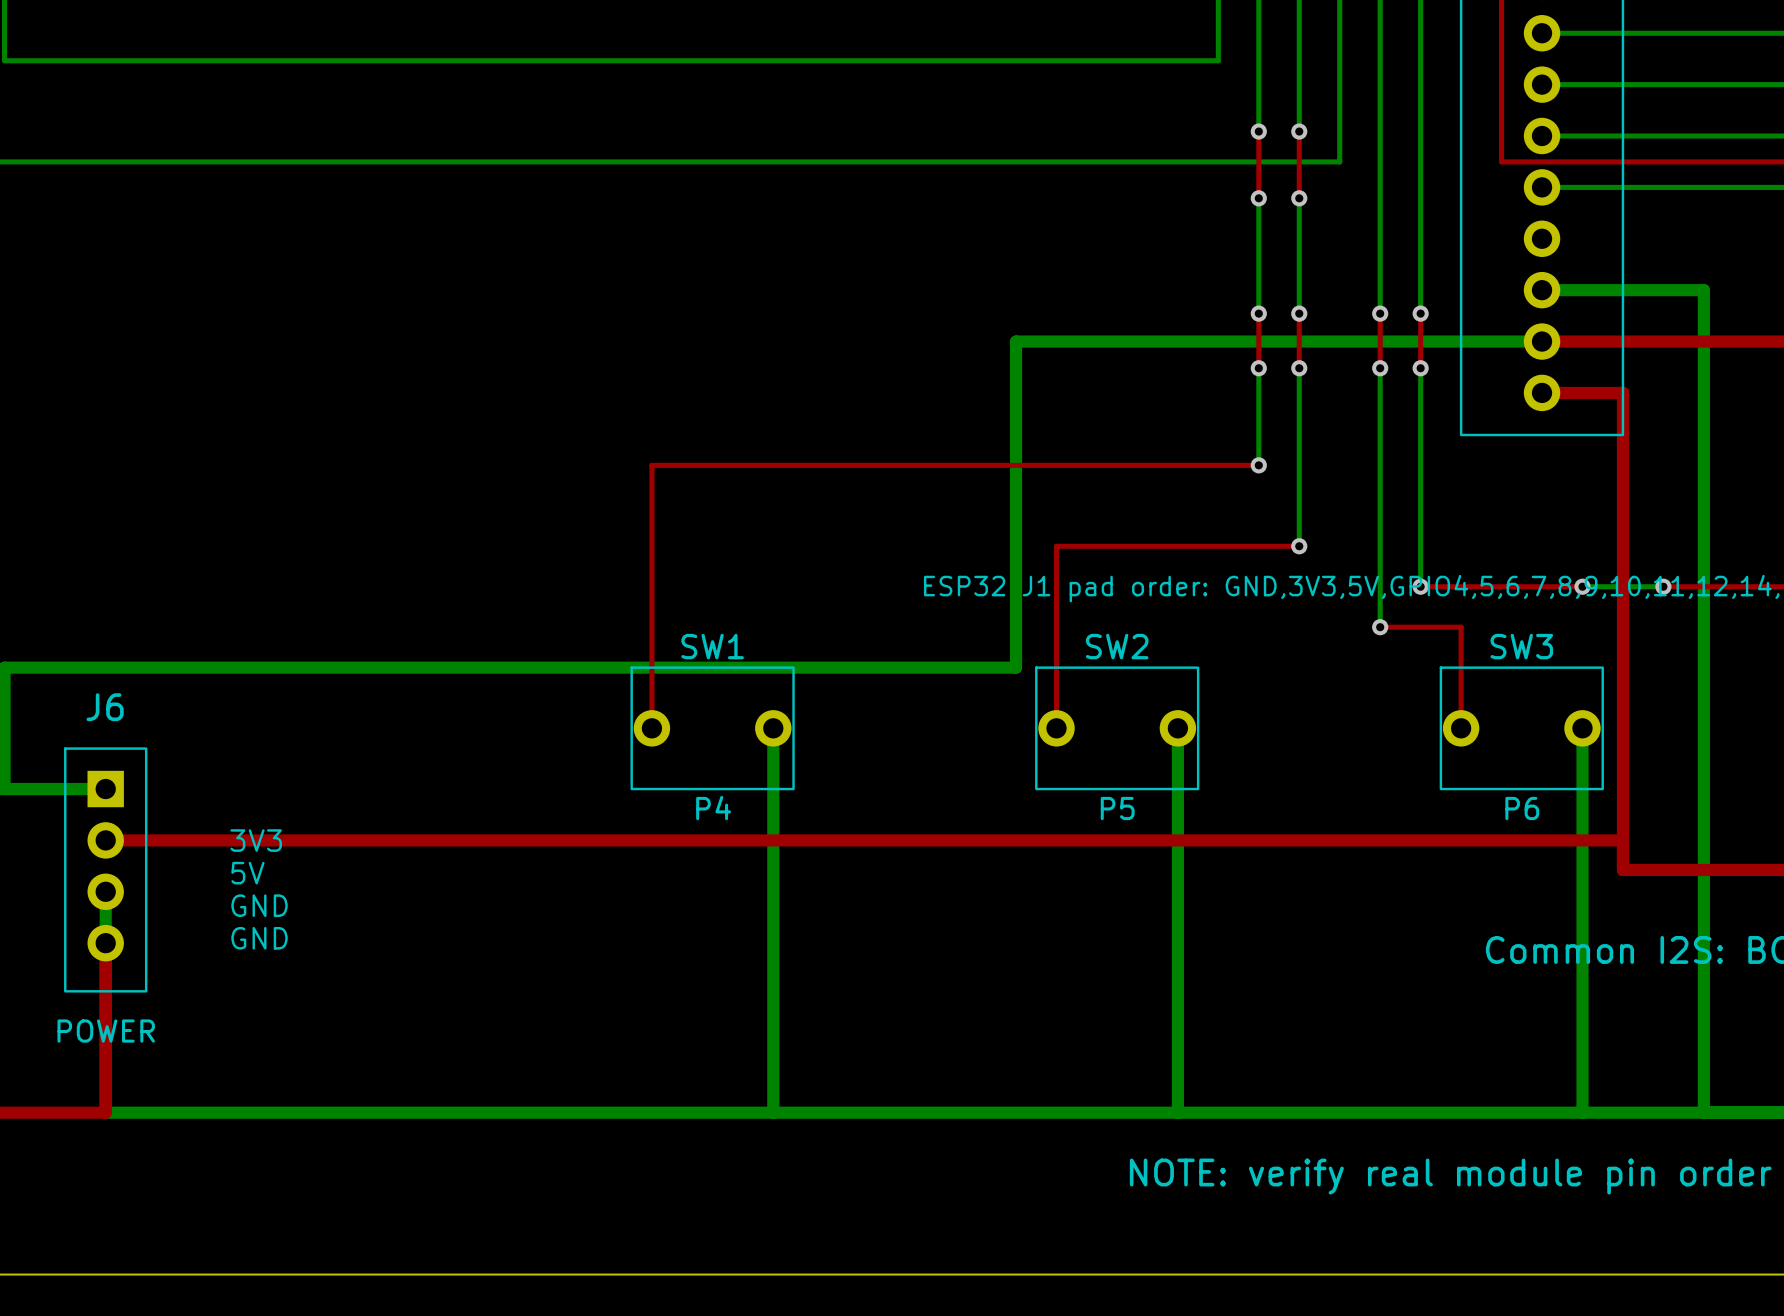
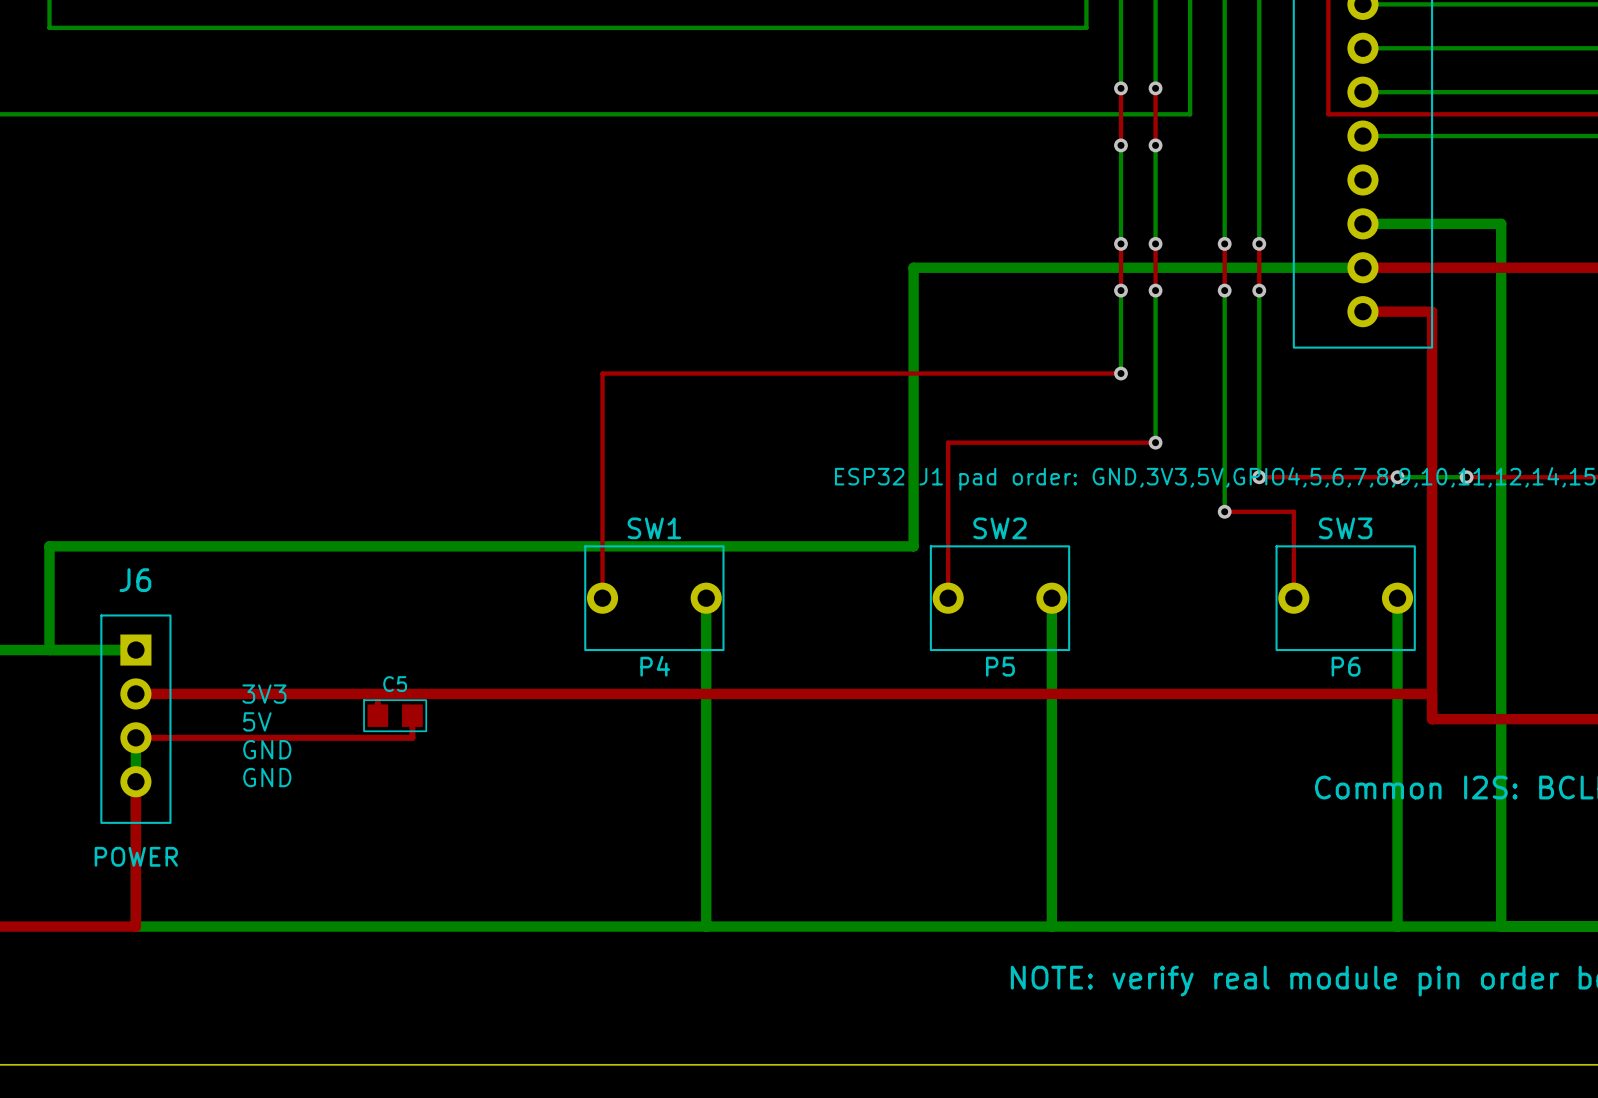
C5: none -> (395, 715)
top track: none -> (412, 715) (412, 737) (135, 737)

